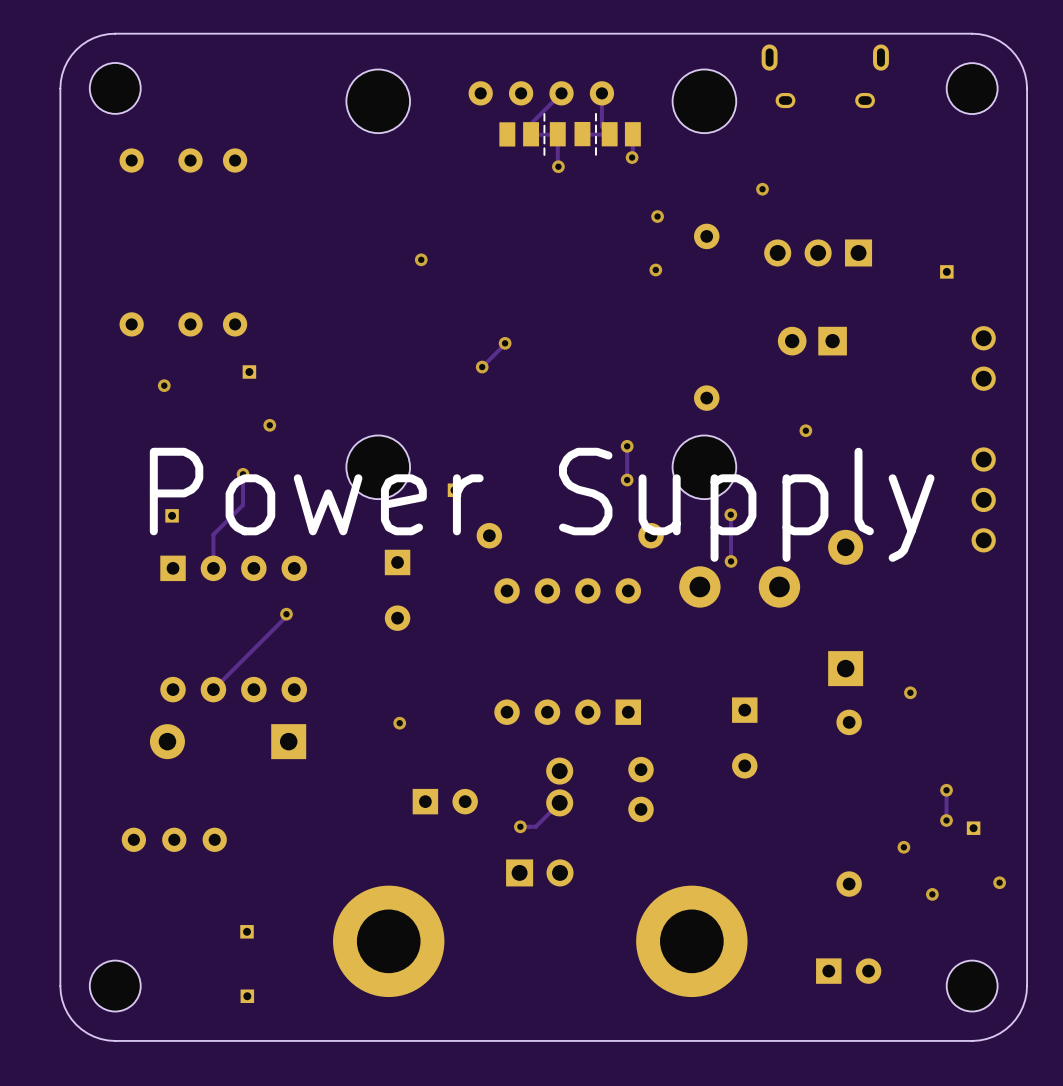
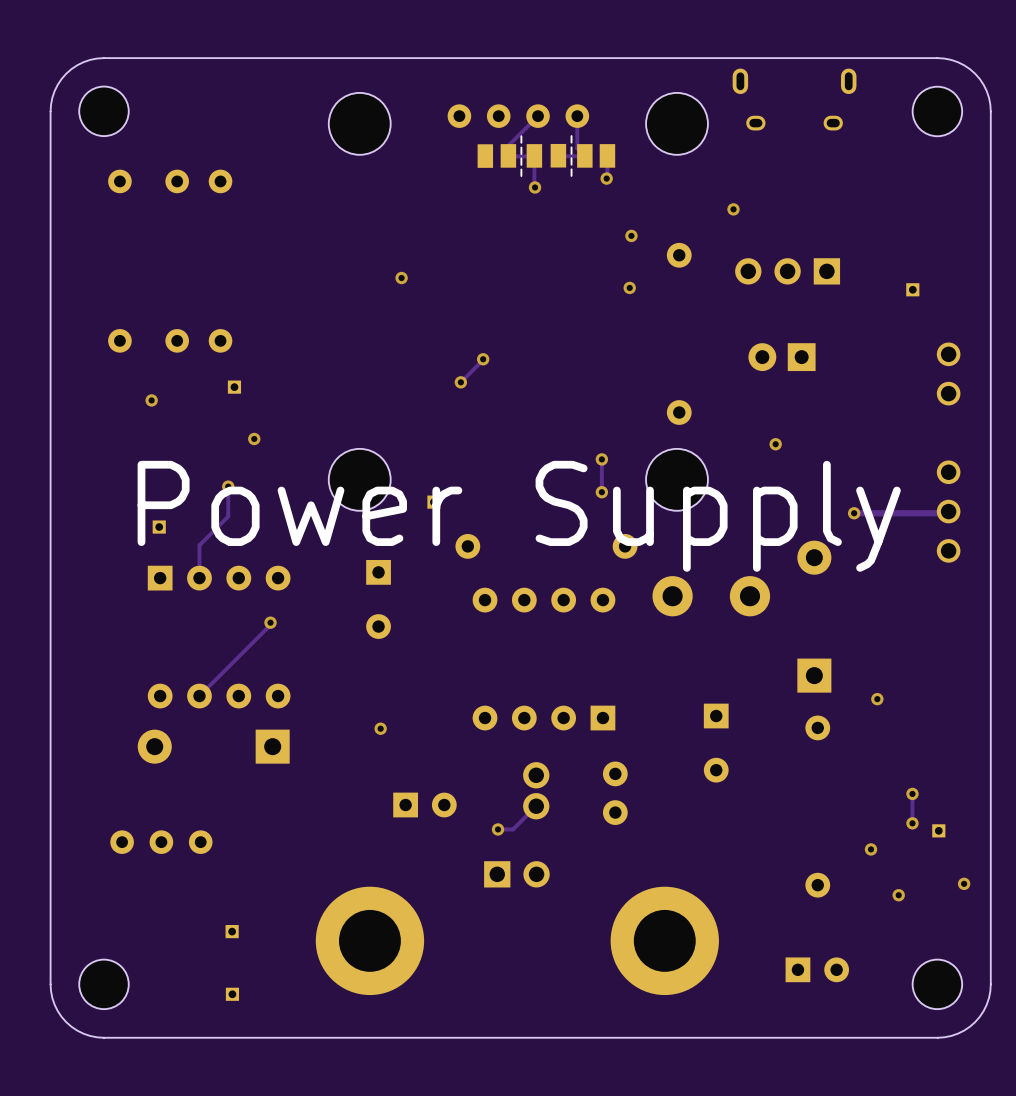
track: none -> (948, 511) (946, 513) (854, 513)
via: none -> (854, 513)
track: (730, 514) (731, 561) -> none
via: (730, 514) -> none
via: (731, 561) -> none

